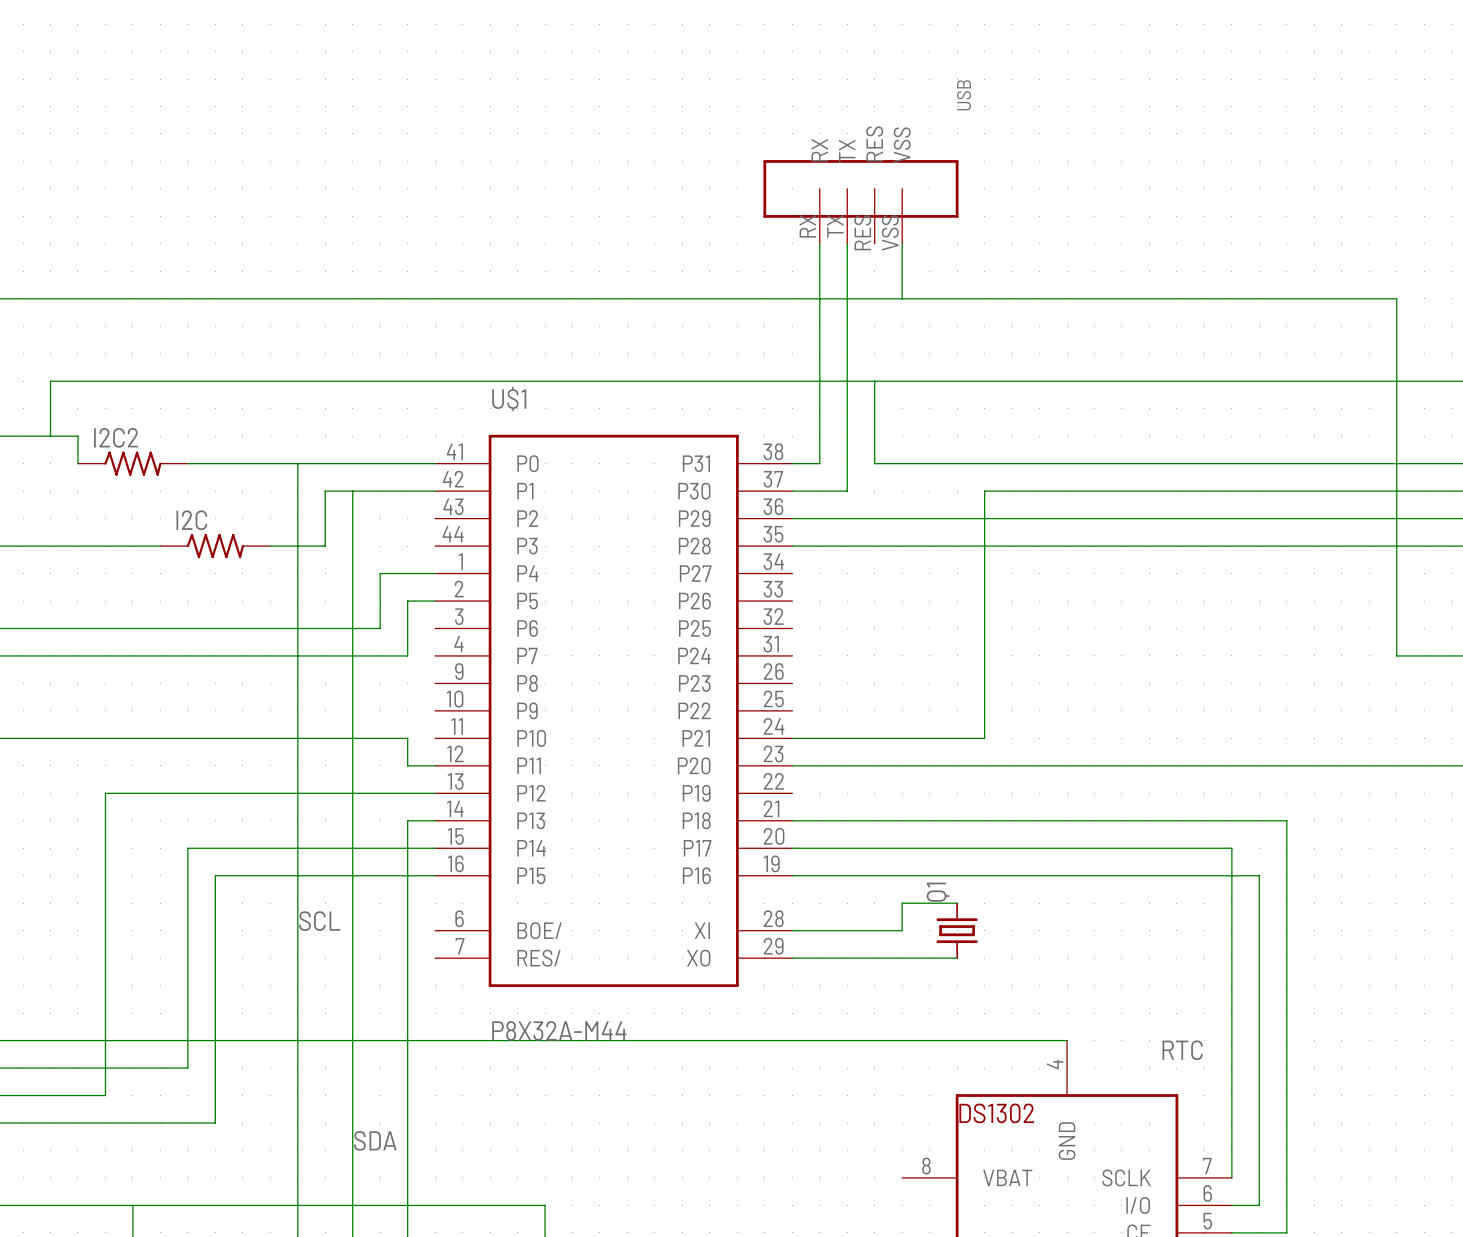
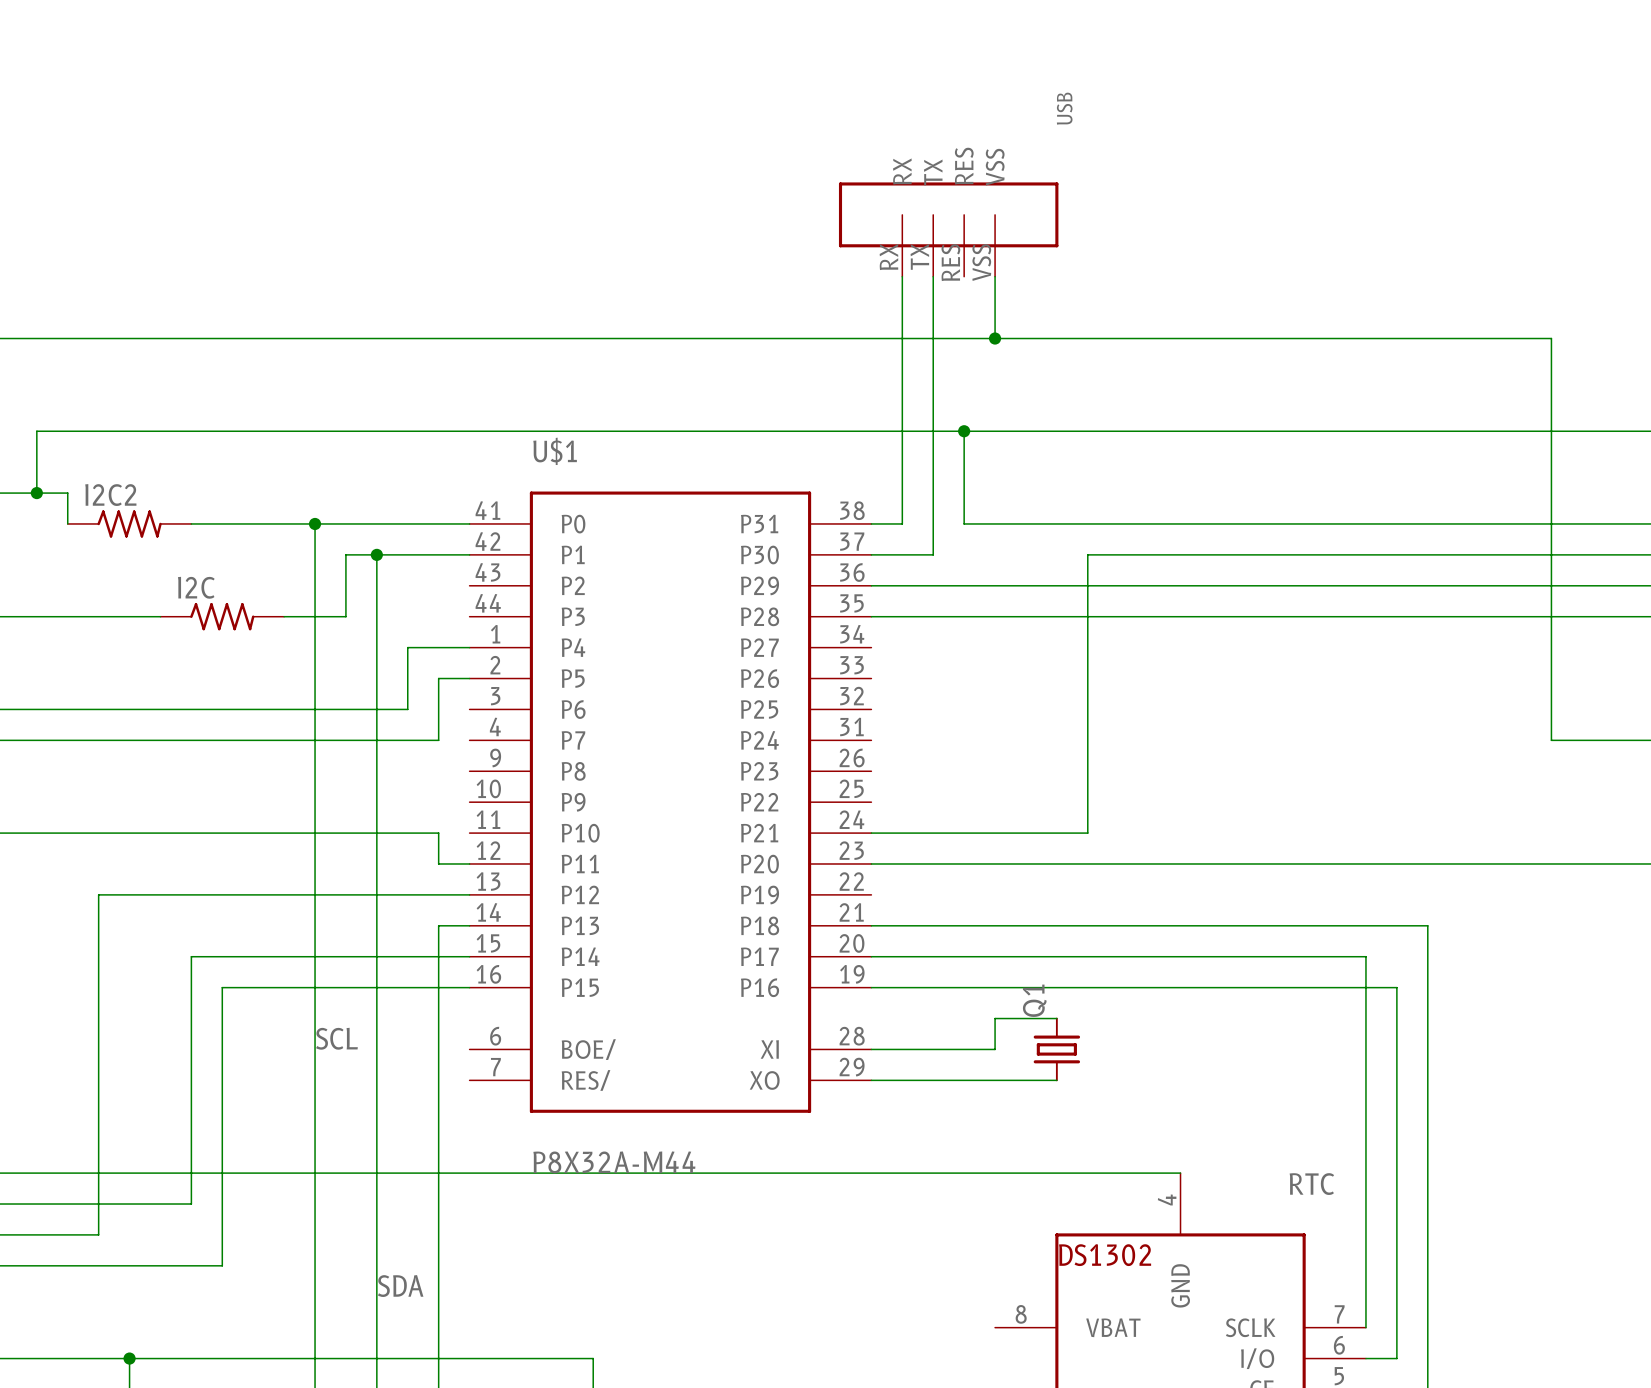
junction: none -> (995, 338)
junction: none -> (964, 431)
junction: none -> (36, 493)
junction: none -> (315, 523)
junction: none -> (376, 554)
junction: none -> (129, 1358)

